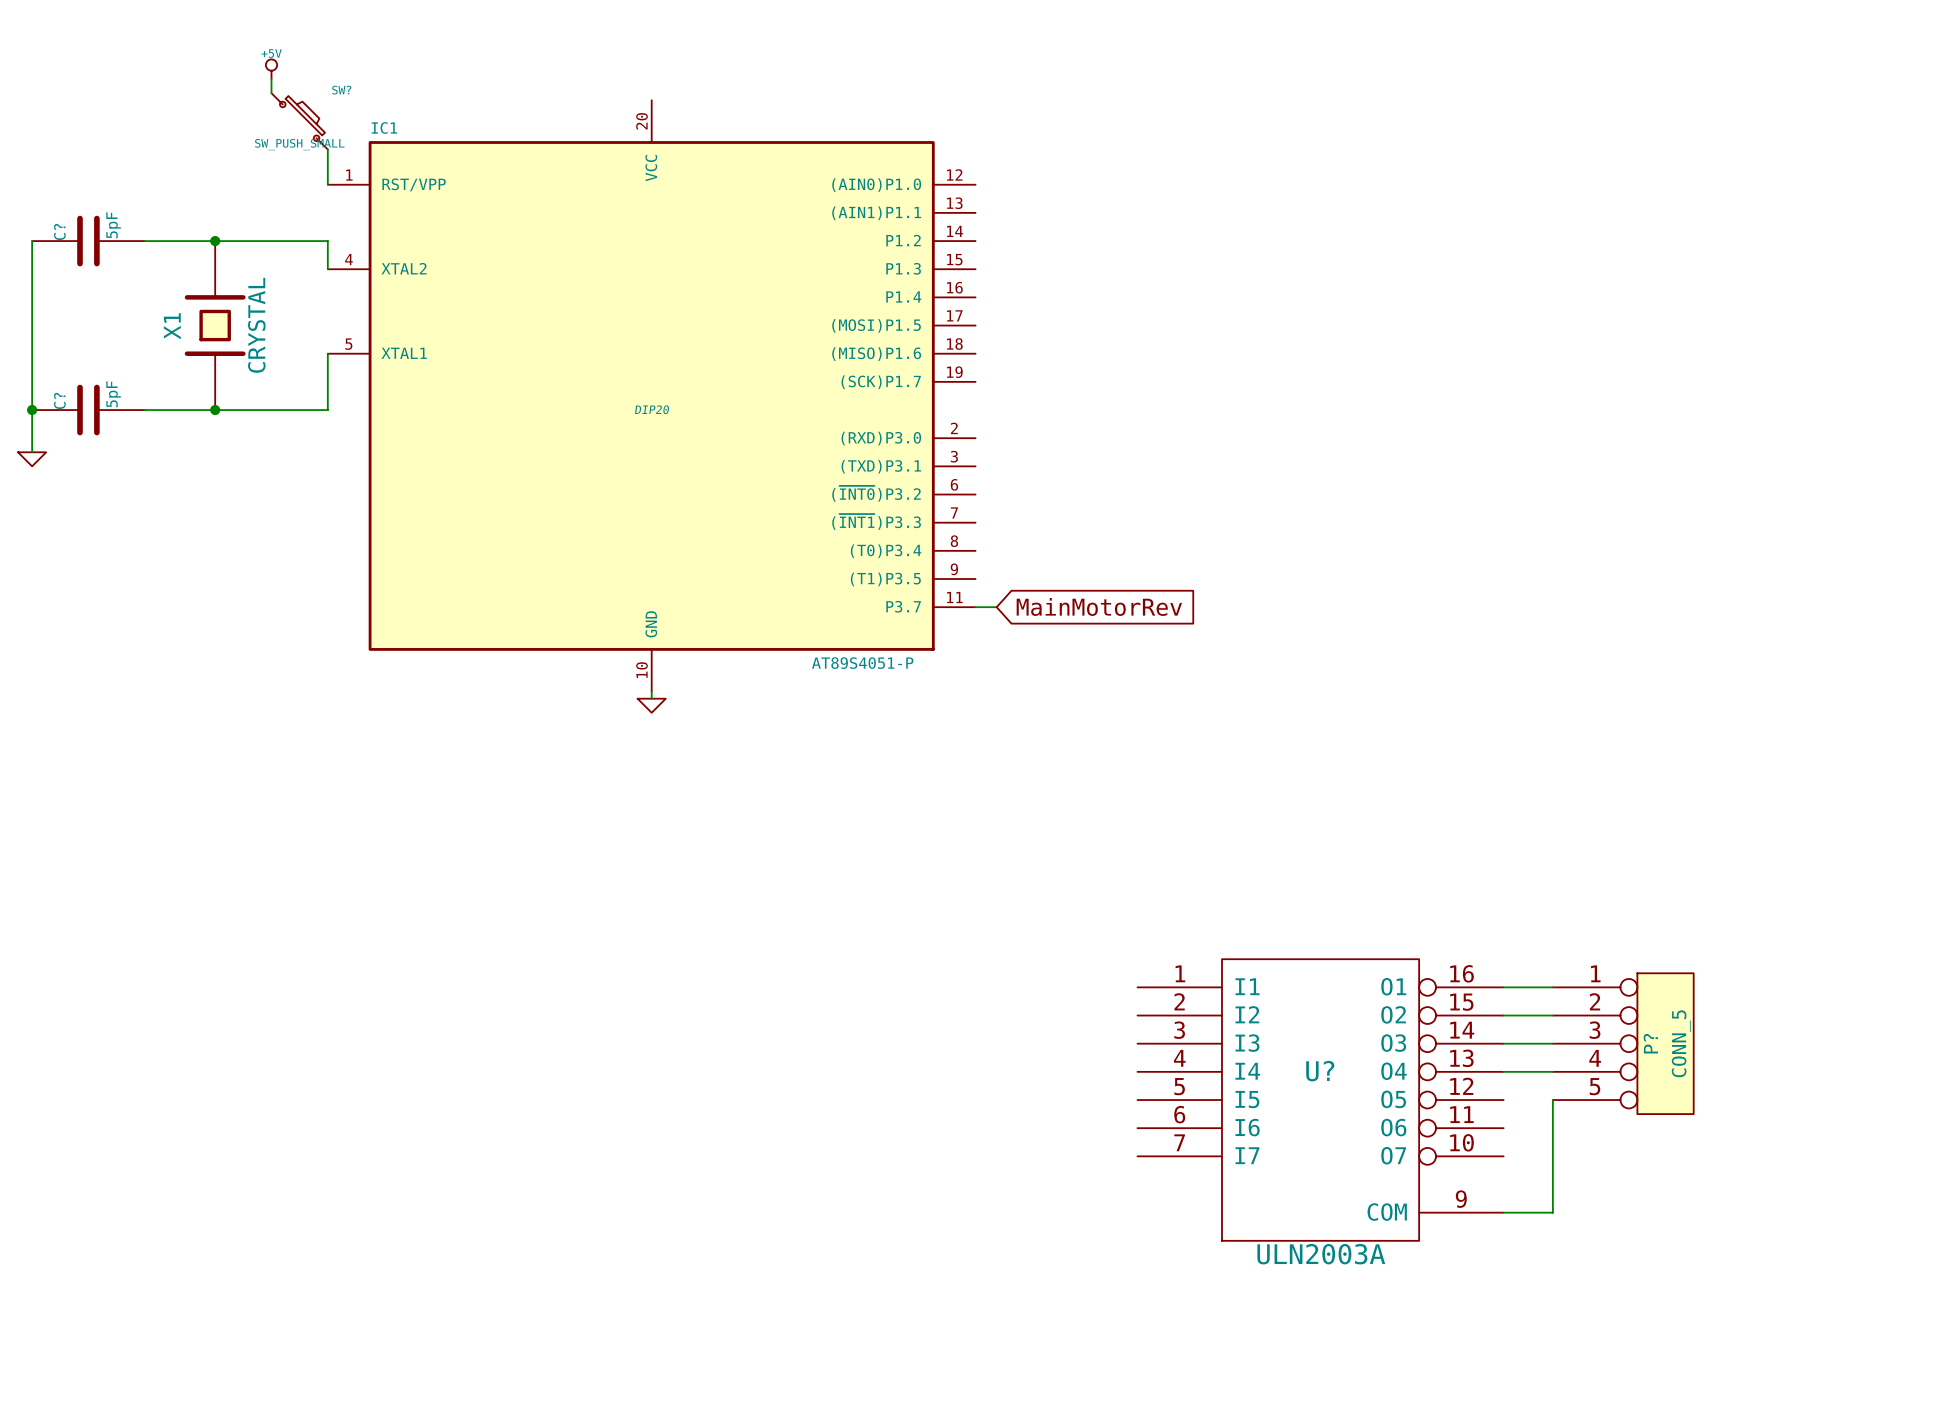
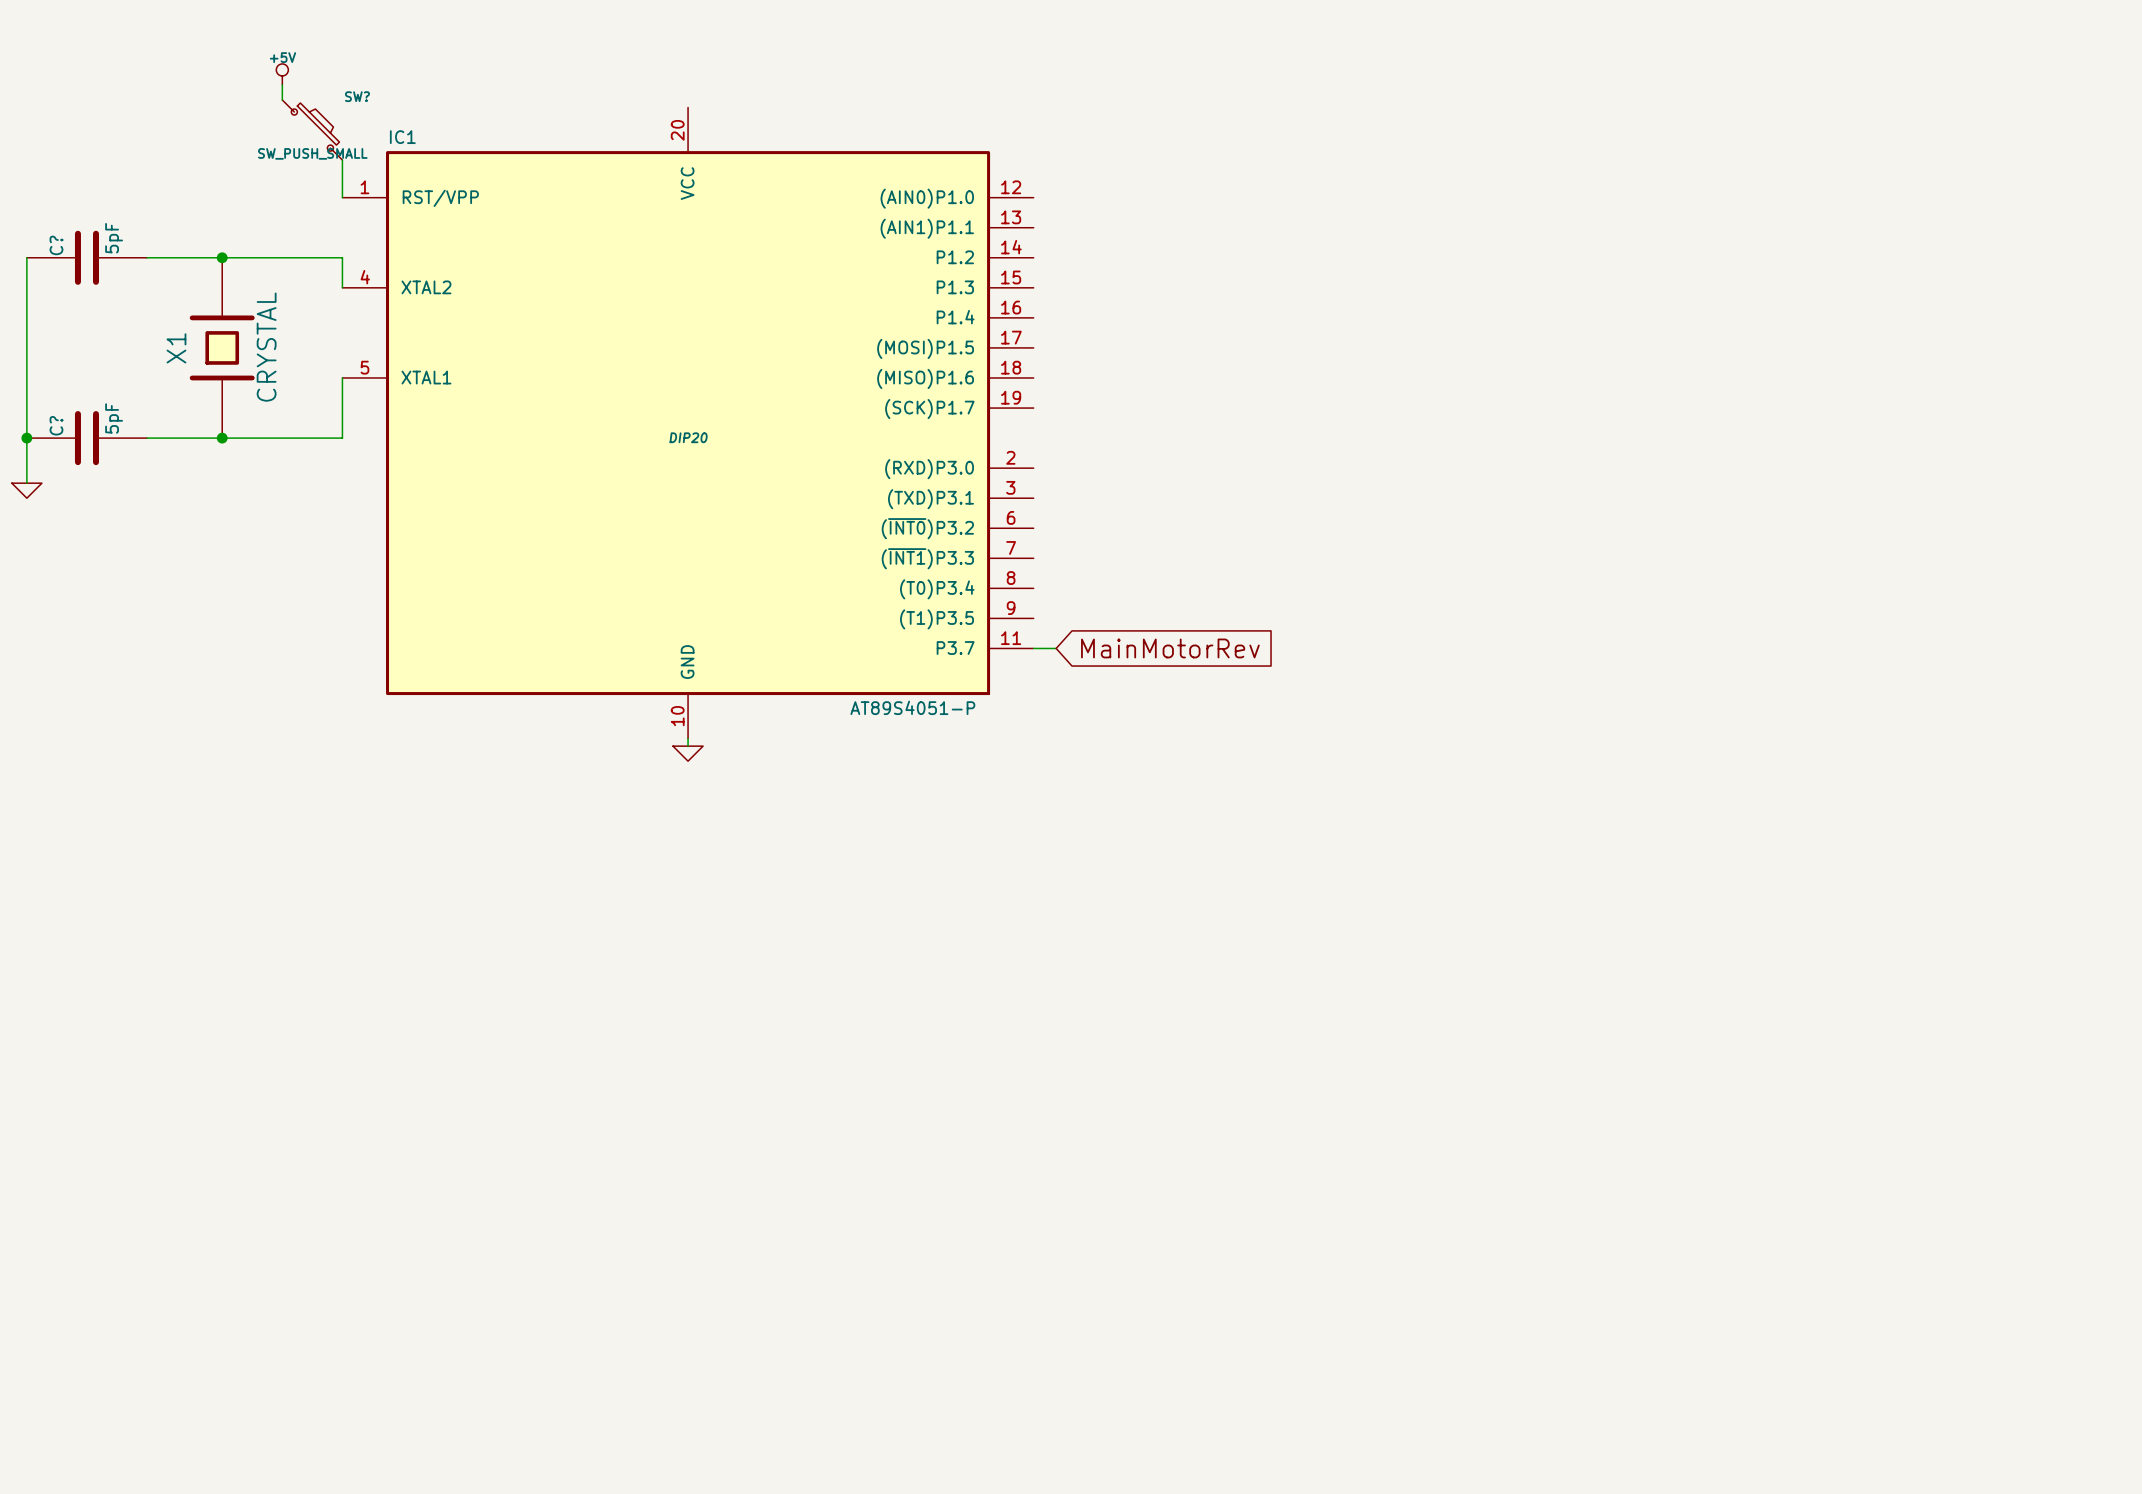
wire: (1503, 987) (1552, 987) -> none
wire: (1503, 1015) (1552, 1015) -> none
wire: (1503, 1043) (1552, 1043) -> none
P?: CONN_5 (1623, 1043) -> none
wire: (1503, 1071) (1552, 1071) -> none
U?: ULN2003A (1320, 1100) -> none
wire: (1552, 1100) (1552, 1212) (1503, 1212) -> none

